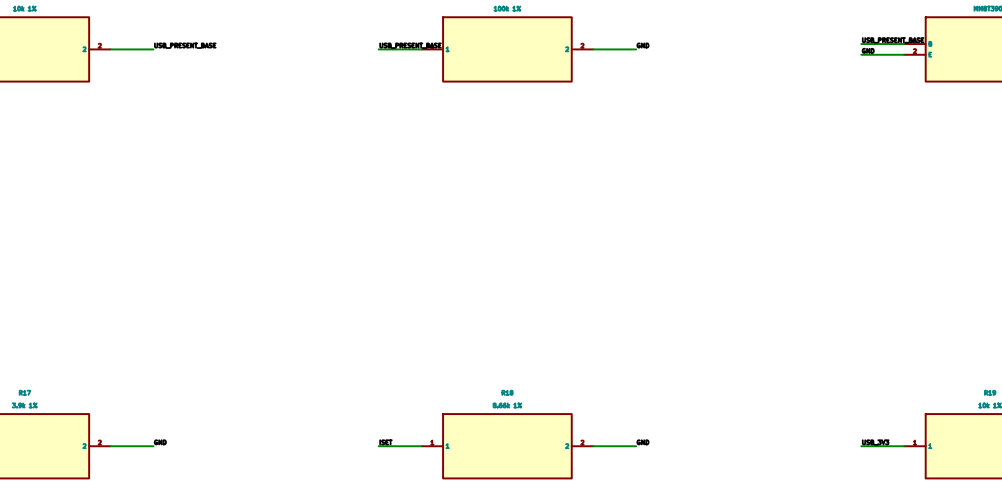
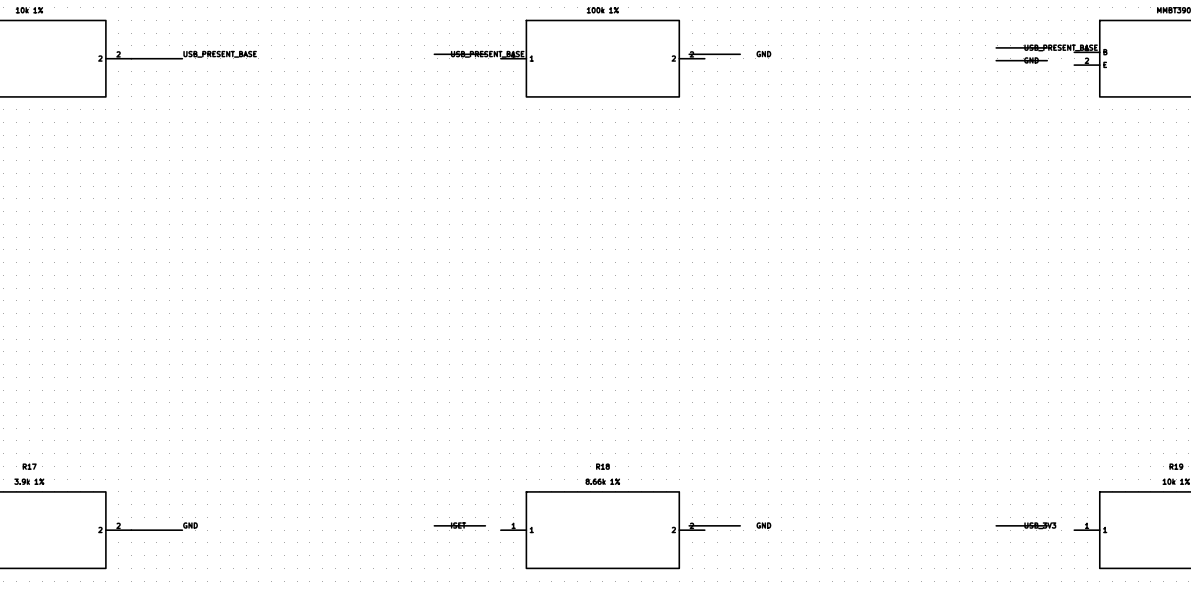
wire: (861, 44) (904, 44) -> (996, 47) (1047, 47)
wire: (378, 49) (421, 49) -> (434, 54) (485, 54)
wire: (593, 49) (636, 49) -> (689, 54) (740, 54)
wire: (861, 54) (904, 54) -> (996, 60) (1047, 60)
wire: (378, 446) (421, 446) -> (434, 525) (485, 525)
wire: (593, 446) (636, 446) -> (689, 525) (740, 525)
wire: (861, 446) (904, 446) -> (996, 525) (1047, 525)

